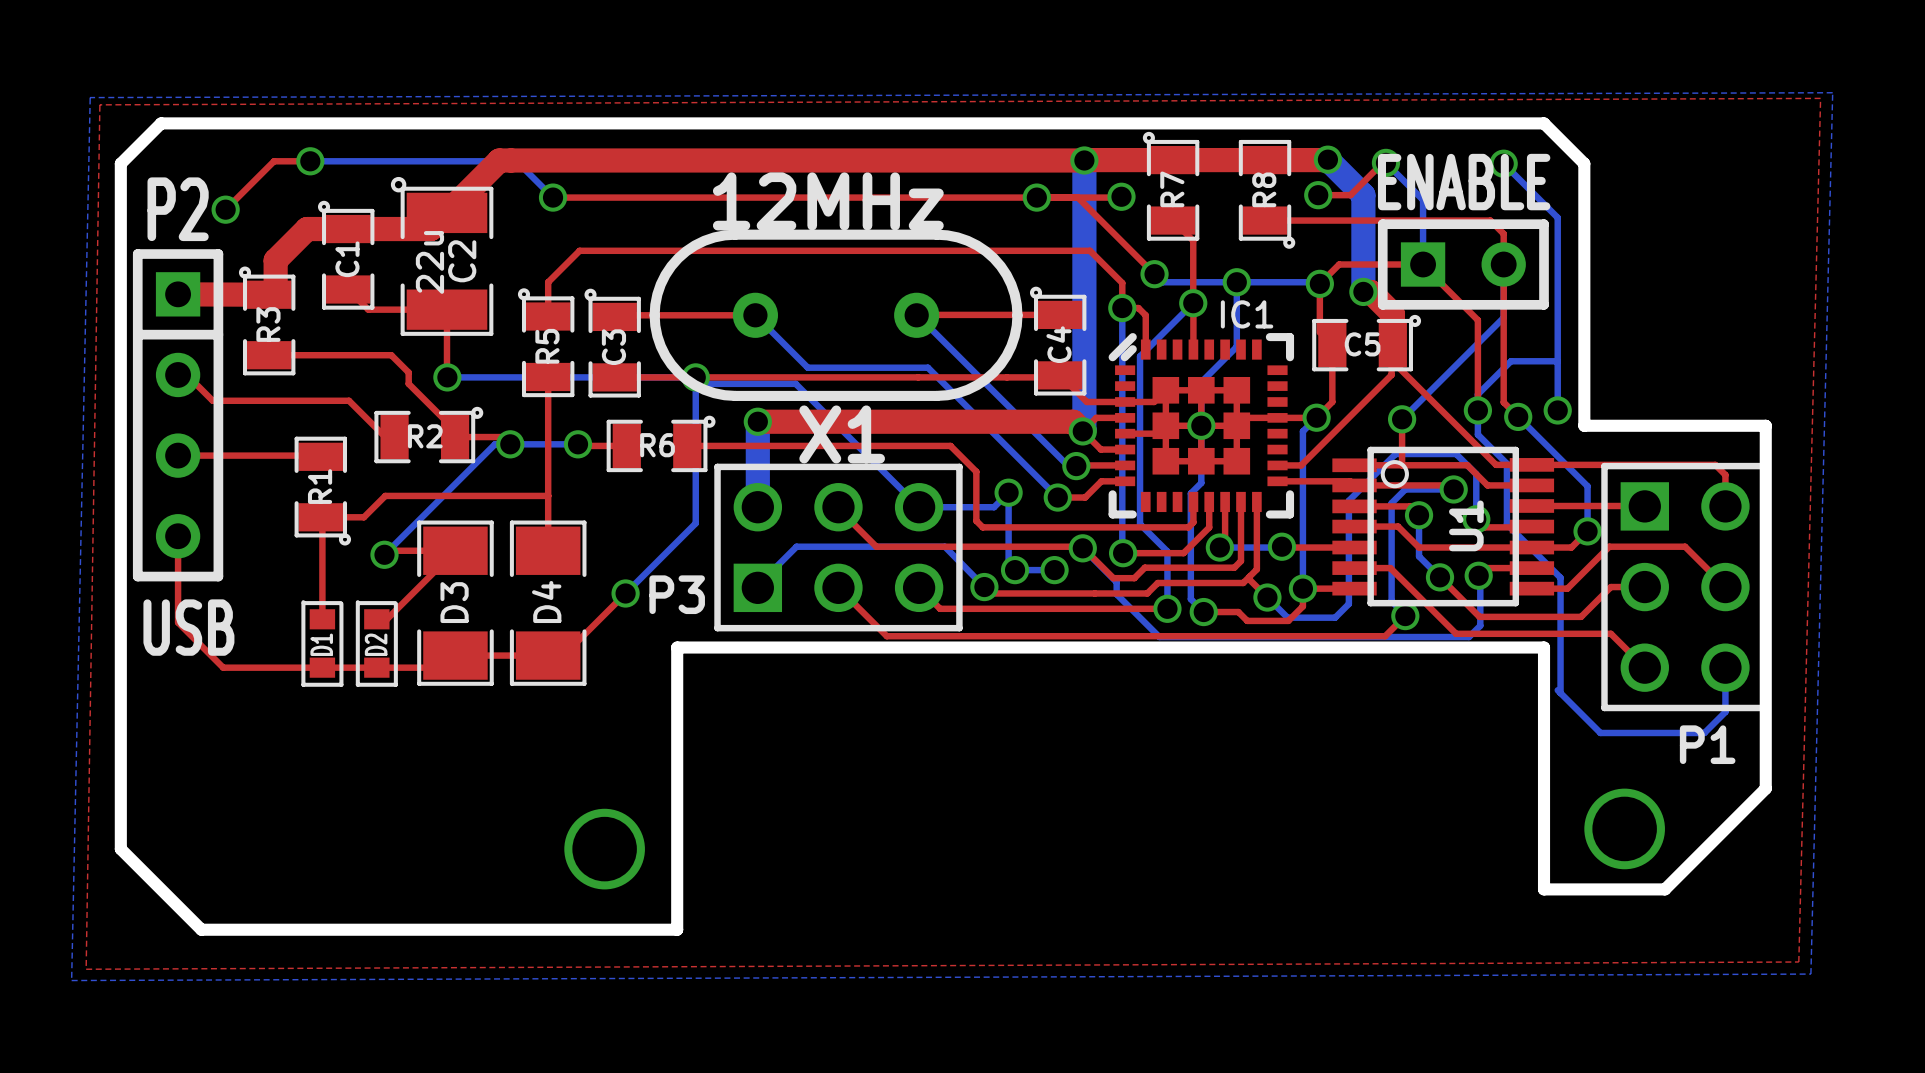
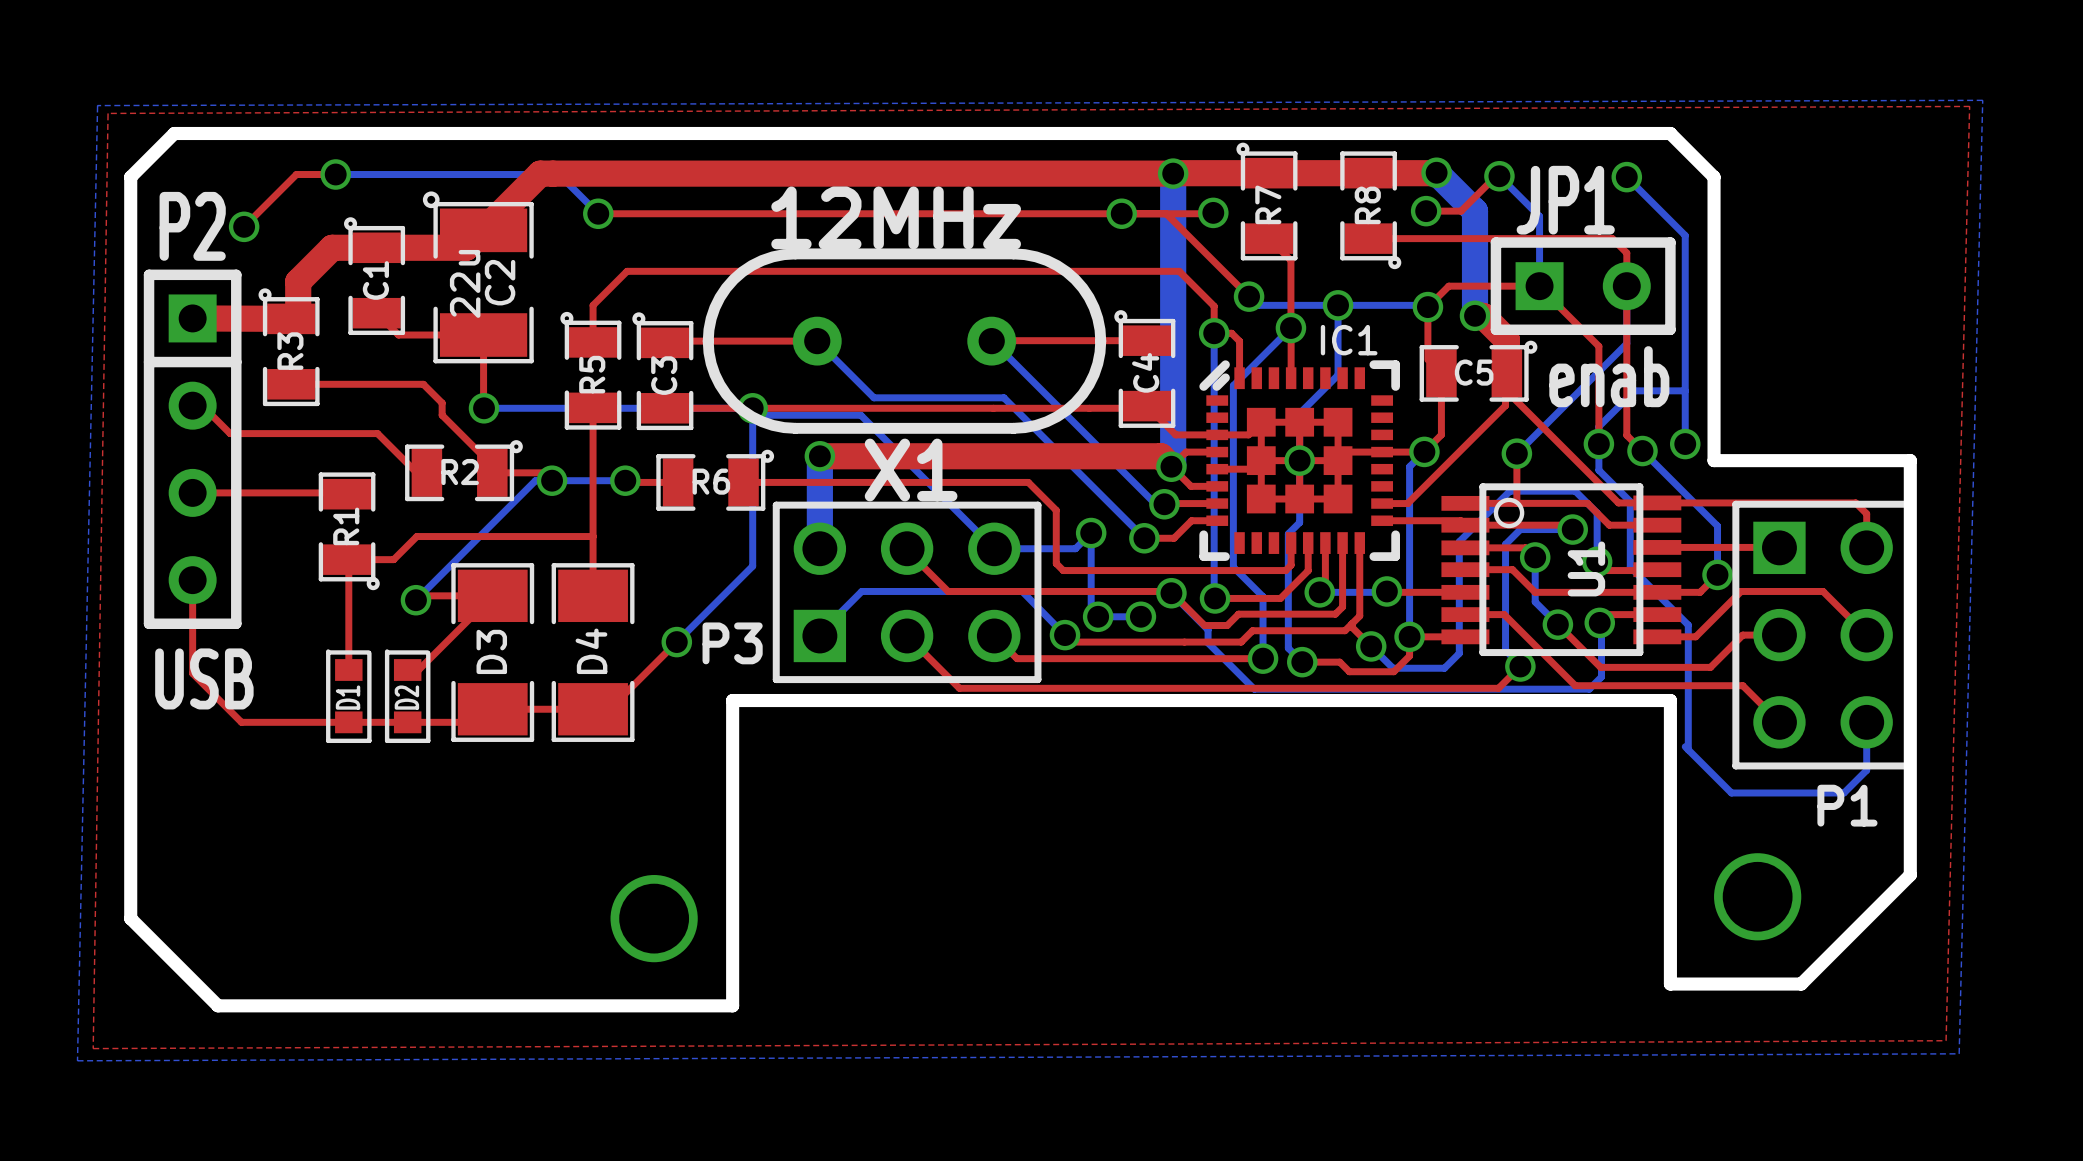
JP1 value: ENABLE (1464, 182) -> enab (1609, 376)
JP1 name: none -> JP1 (1565, 200)
board edge: (1765, 788) (1664, 889) (1544, 889) -> (1910, 853) (1910, 874) (1801, 984) (1670, 984) (1670, 962)

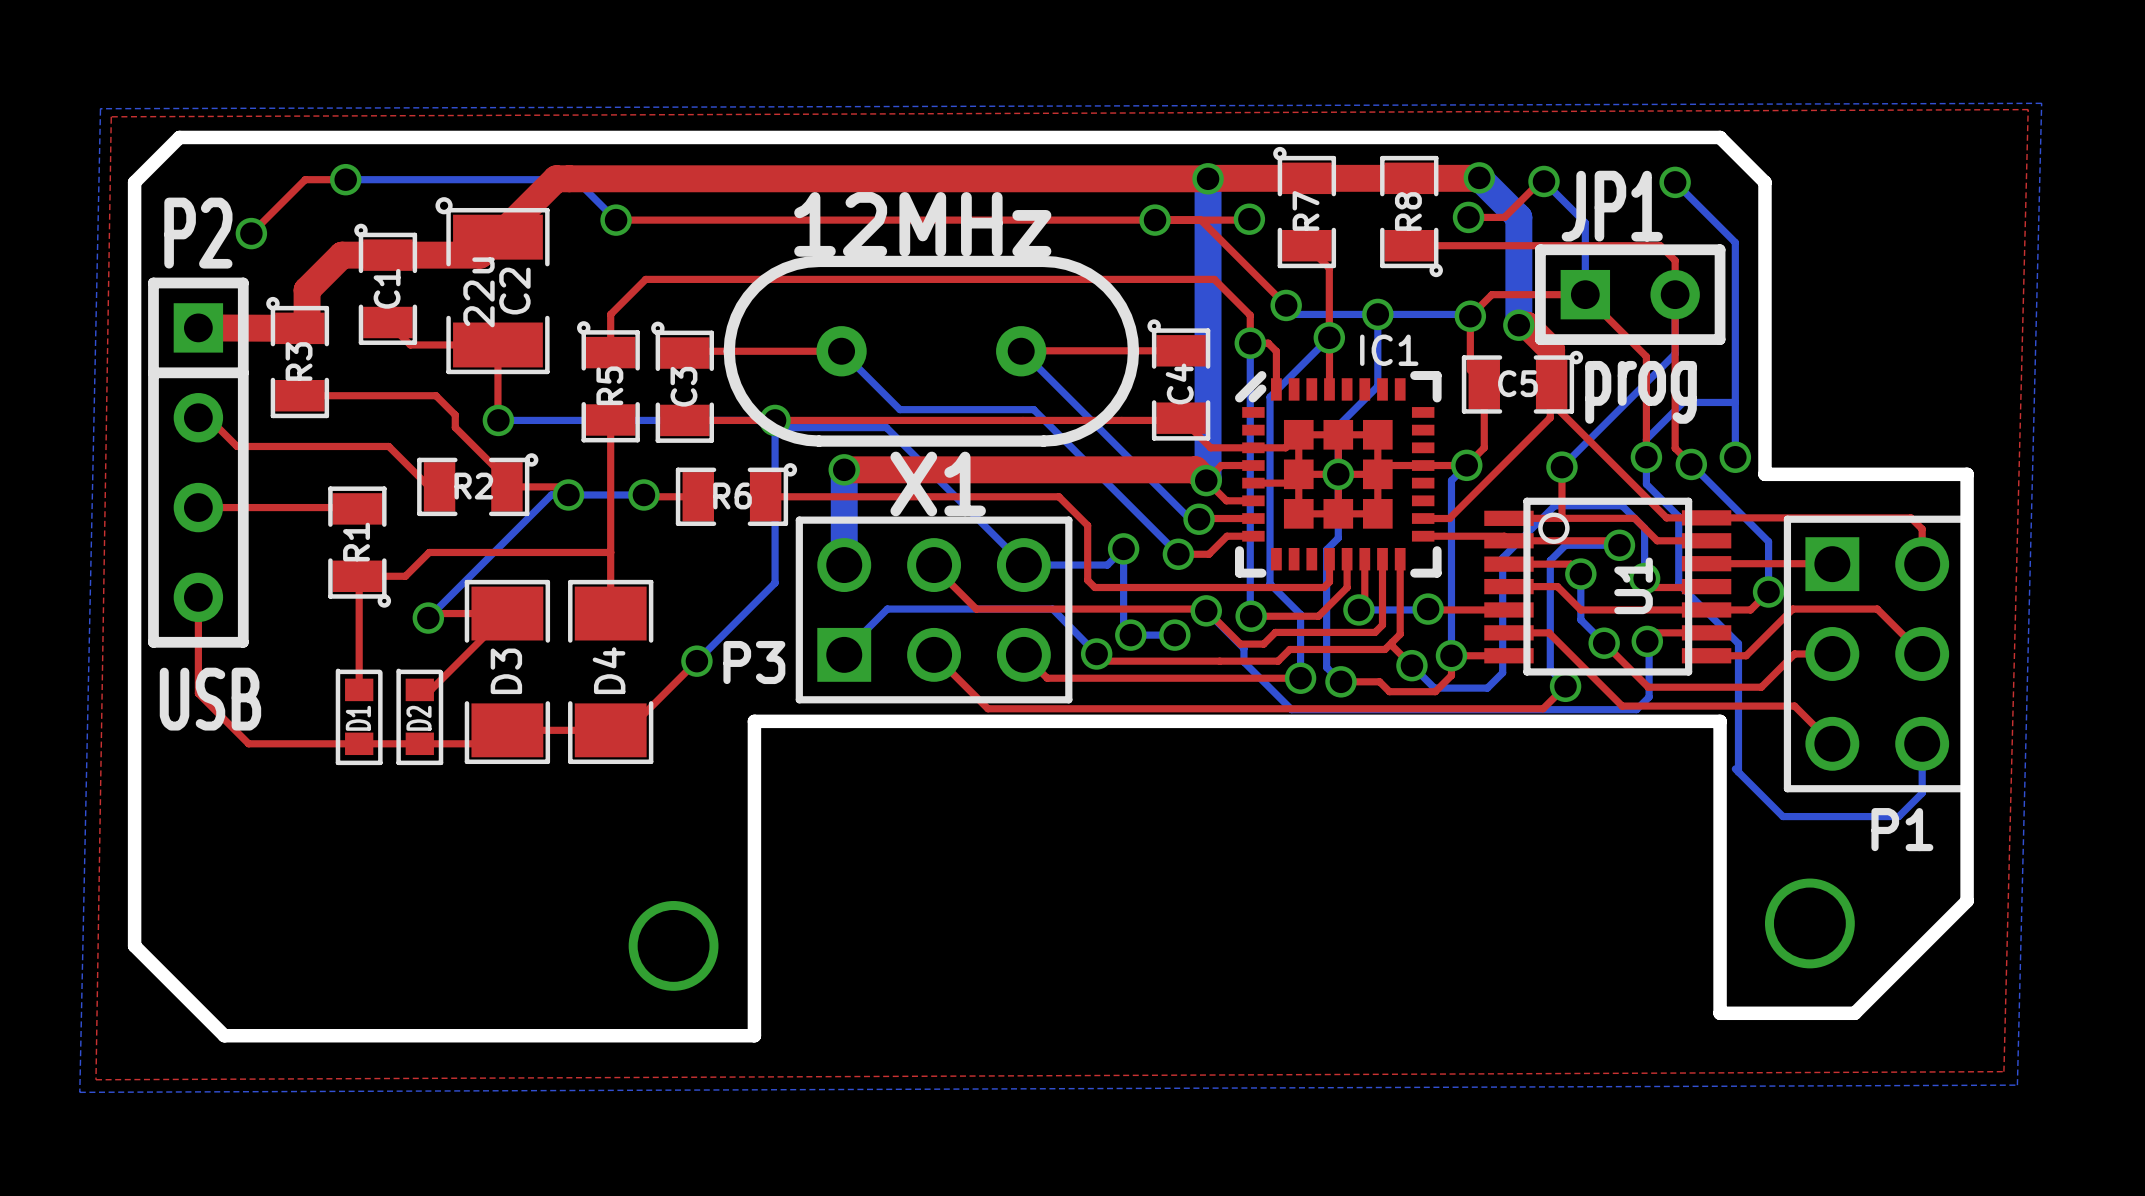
JP1 value: enab (1609, 376) -> prog (1641, 392)

